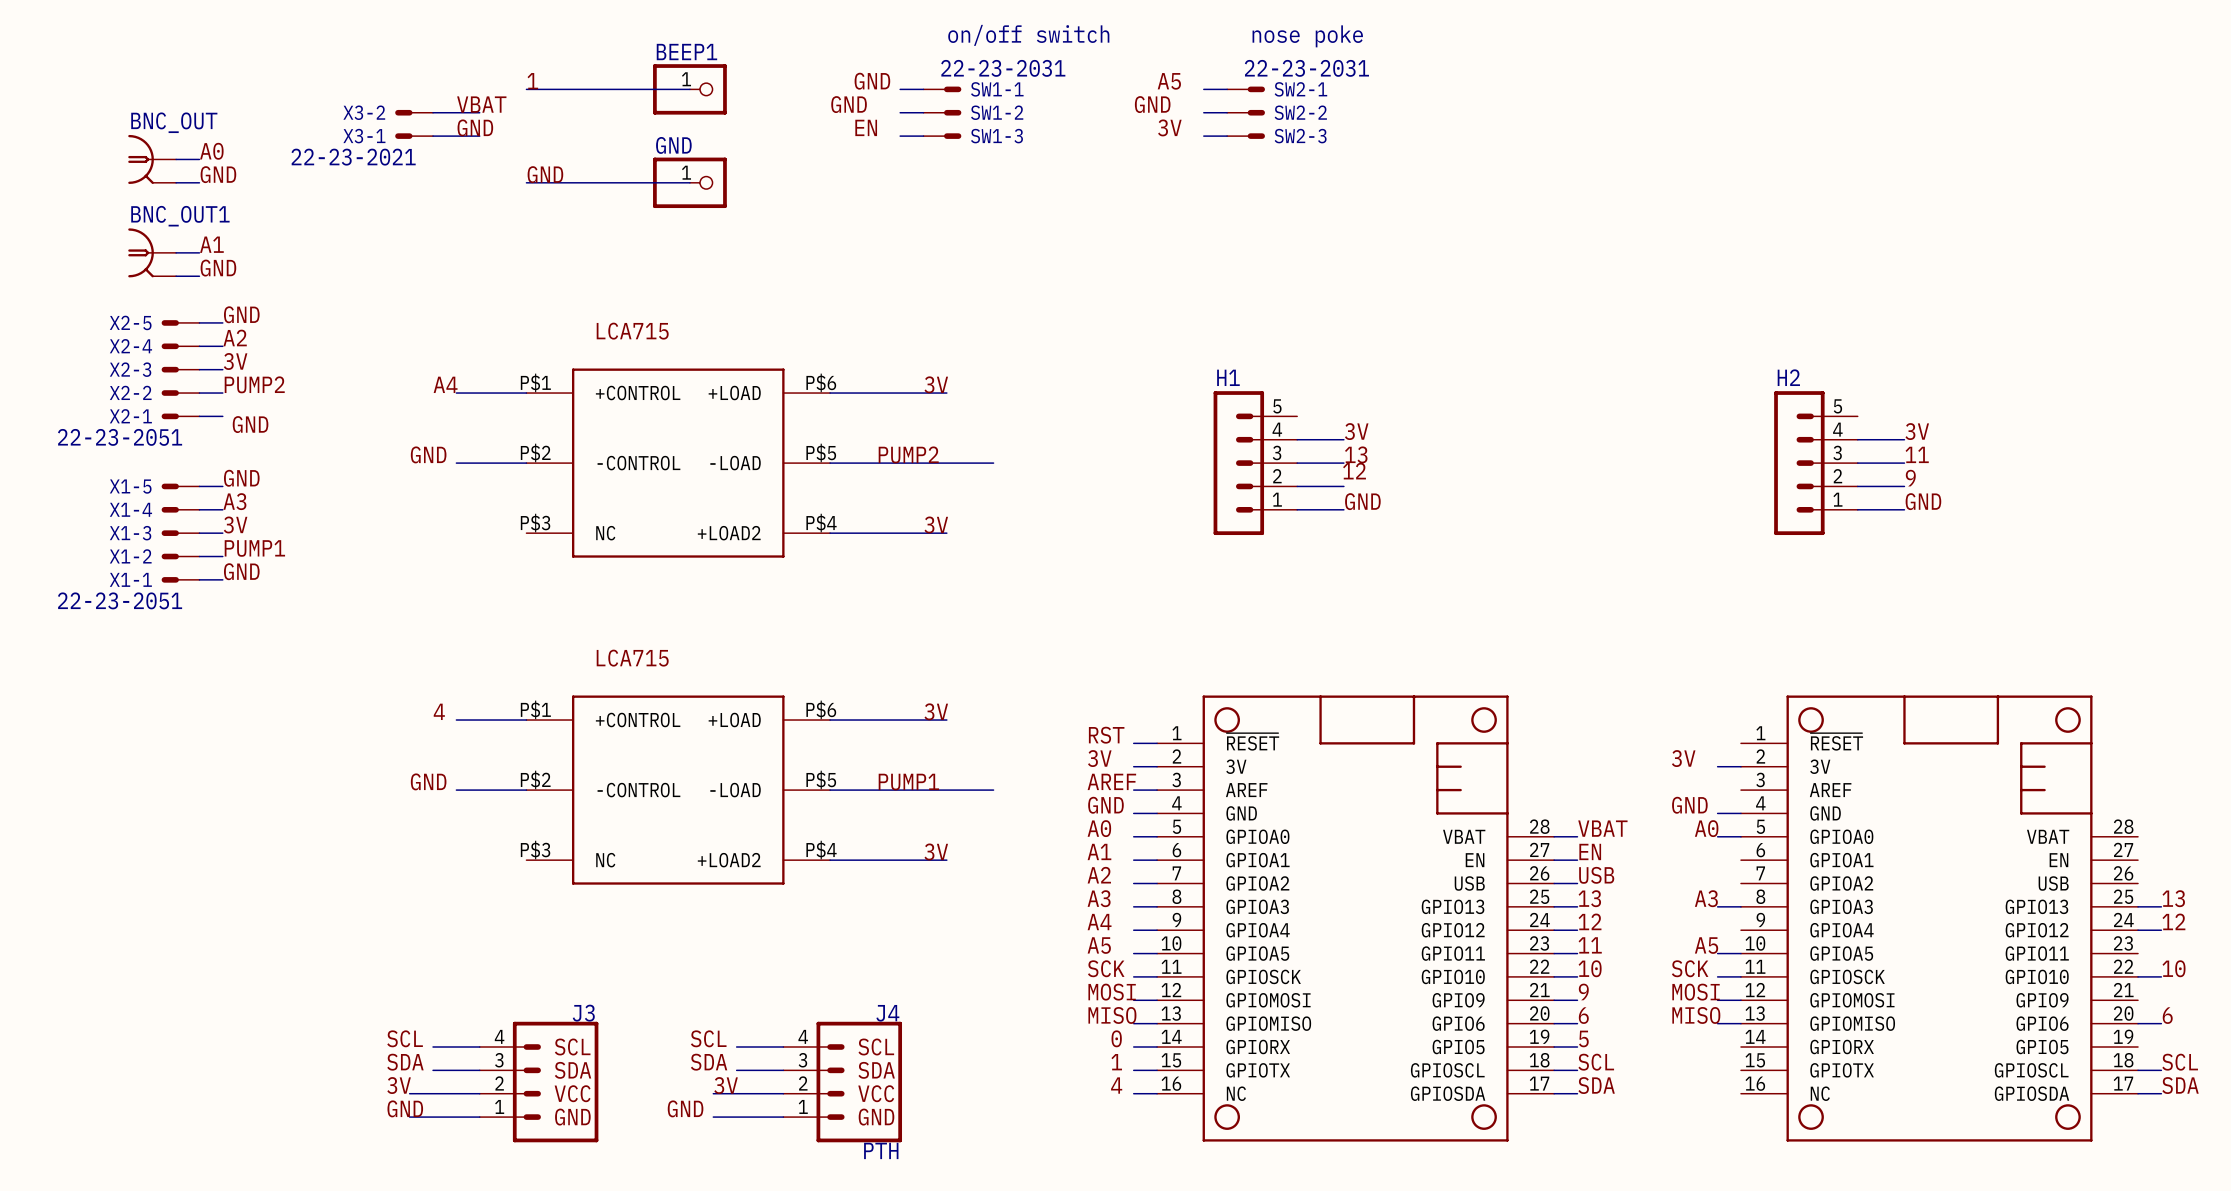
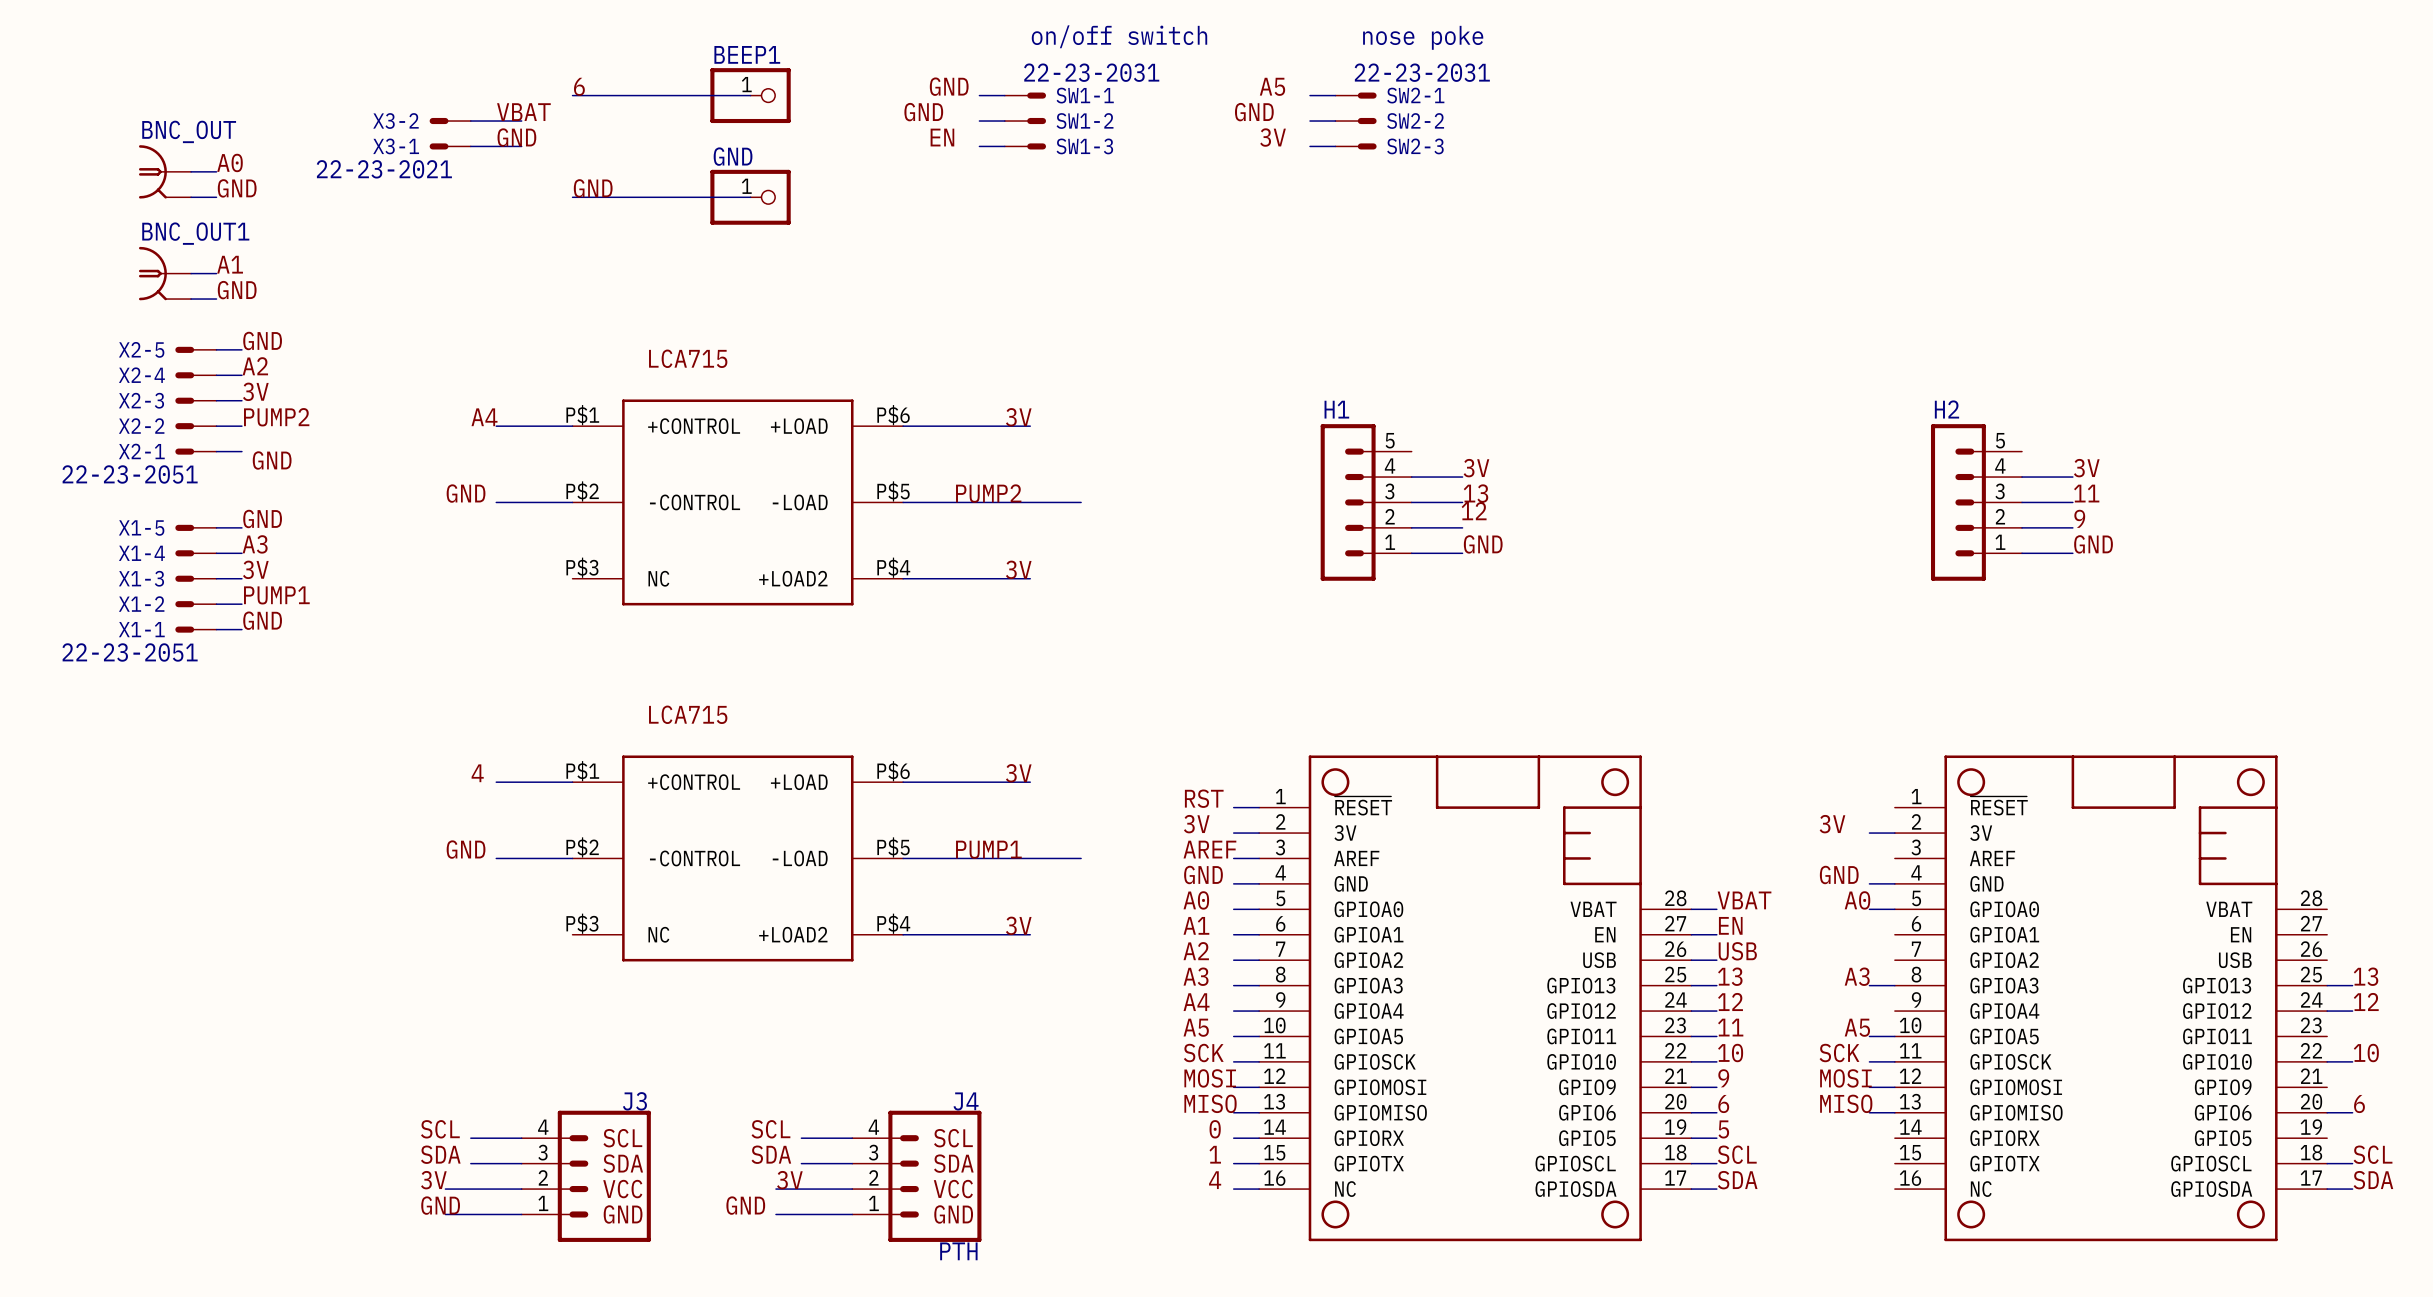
label: 1 (532, 81) -> 6 (579, 86)

